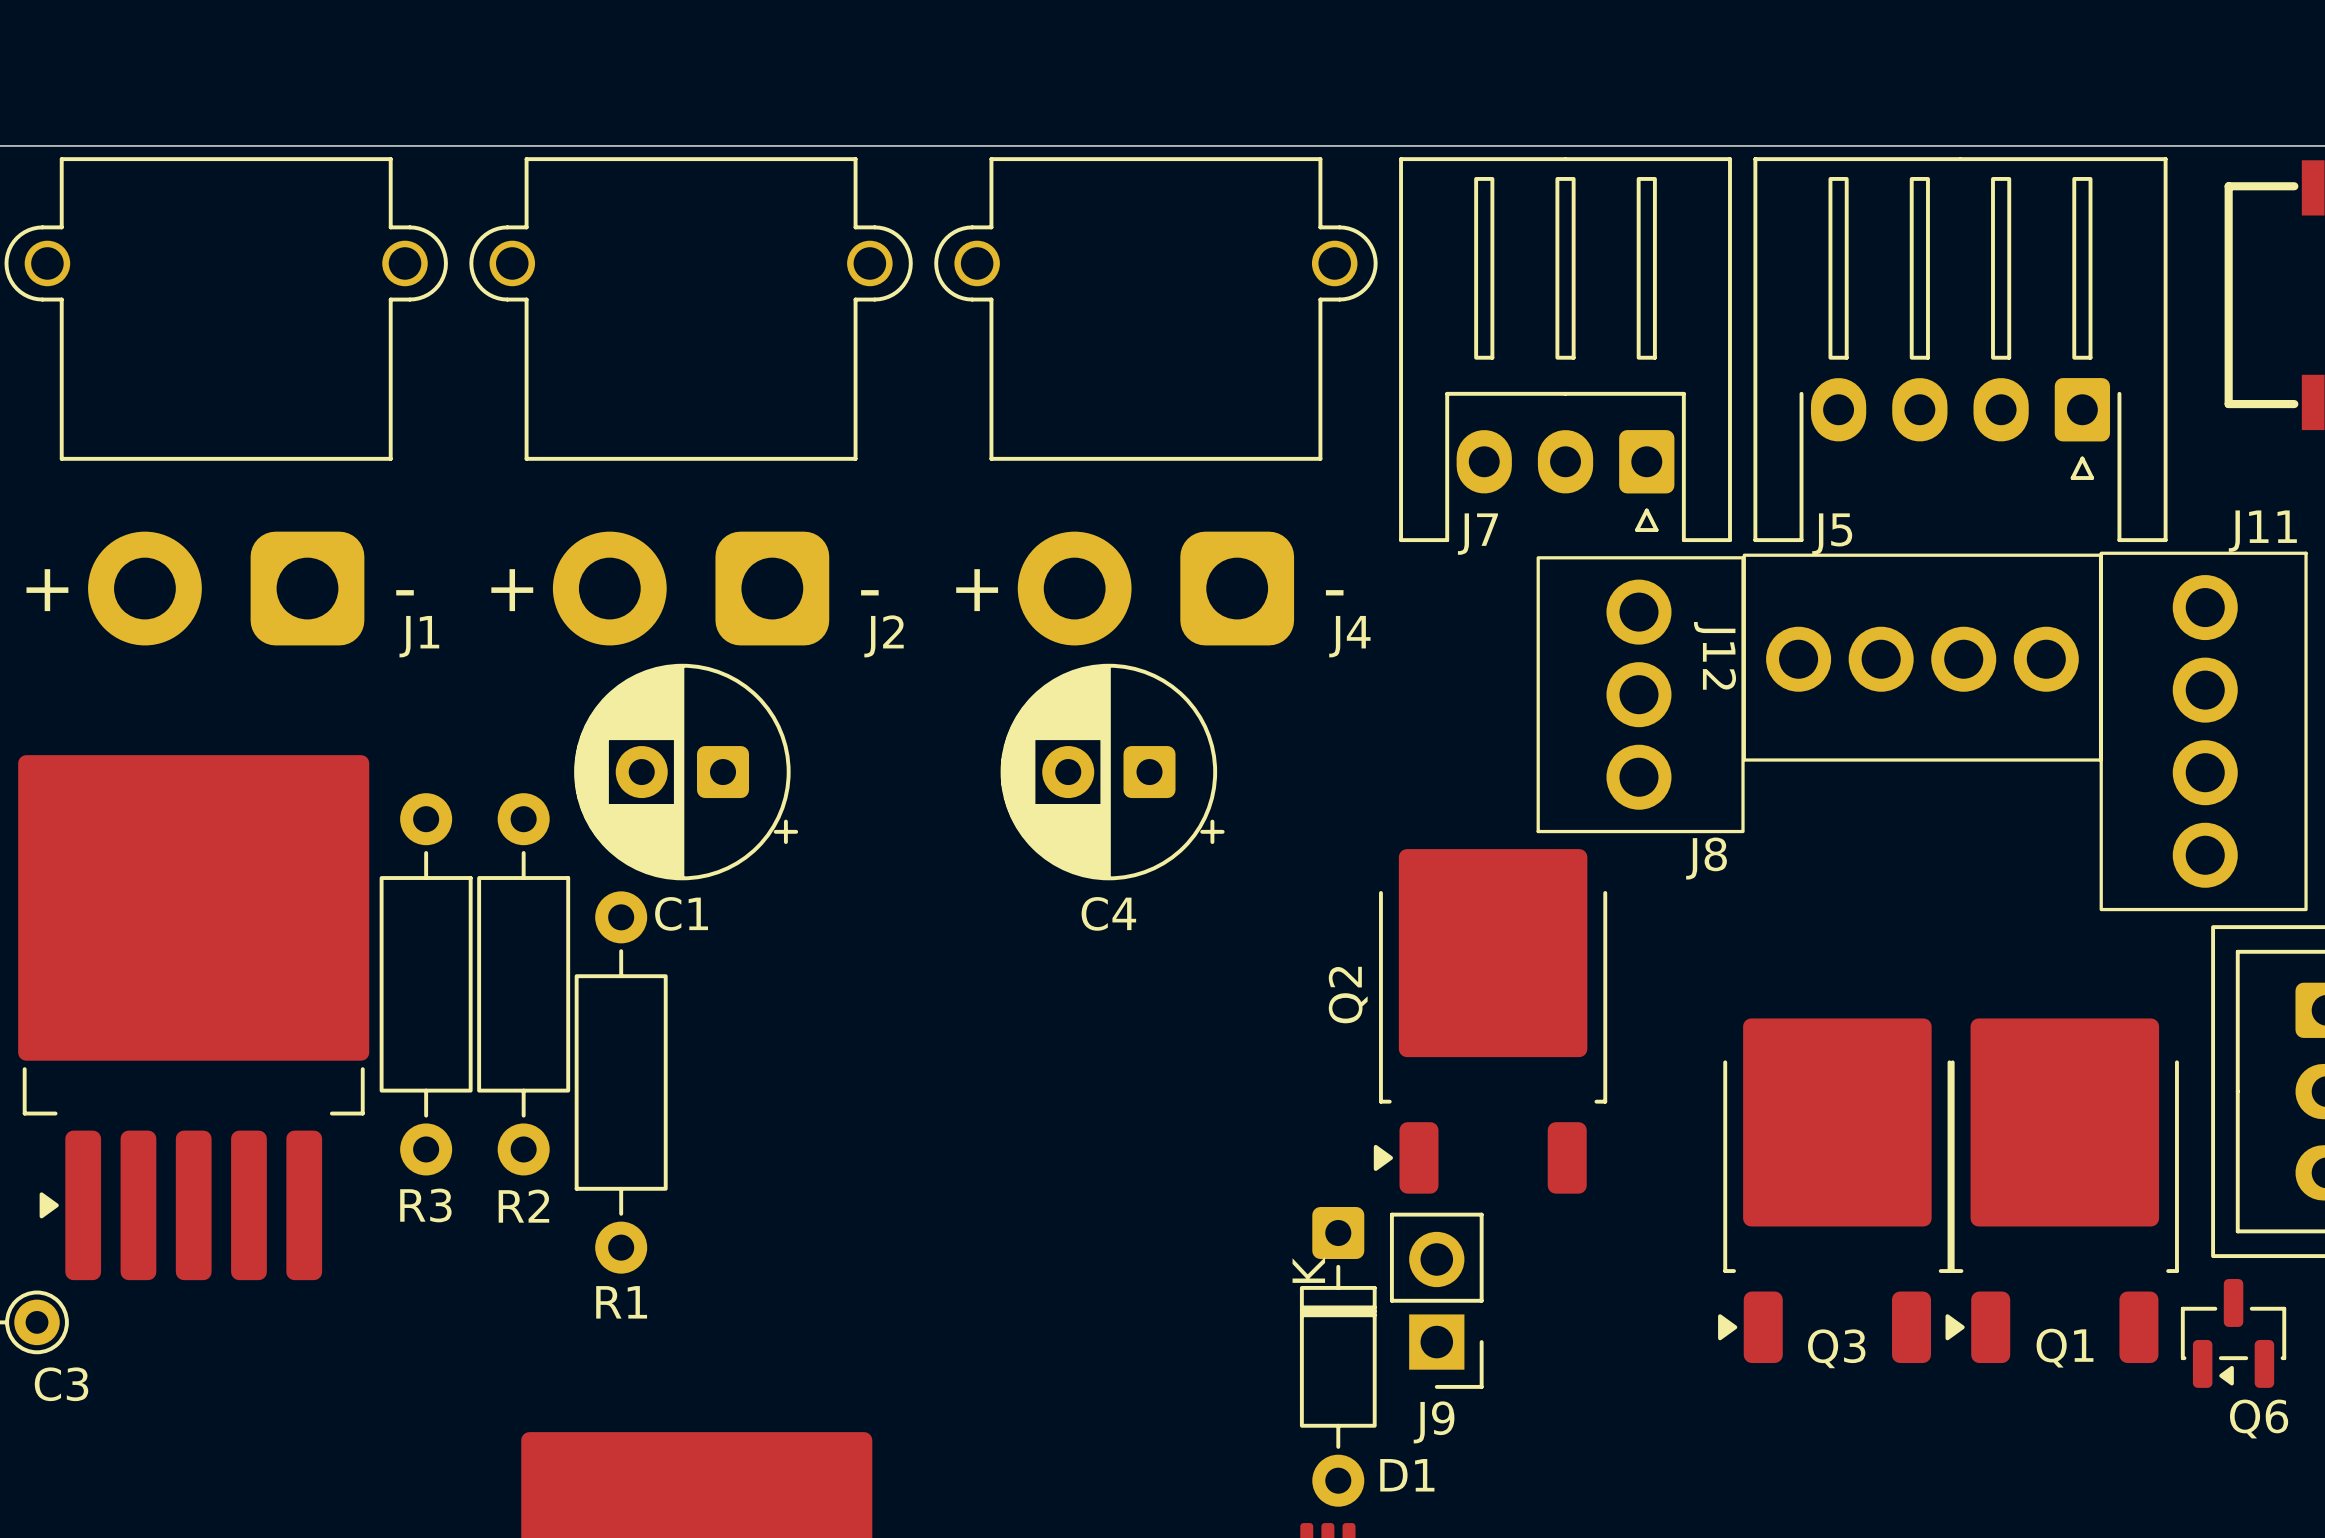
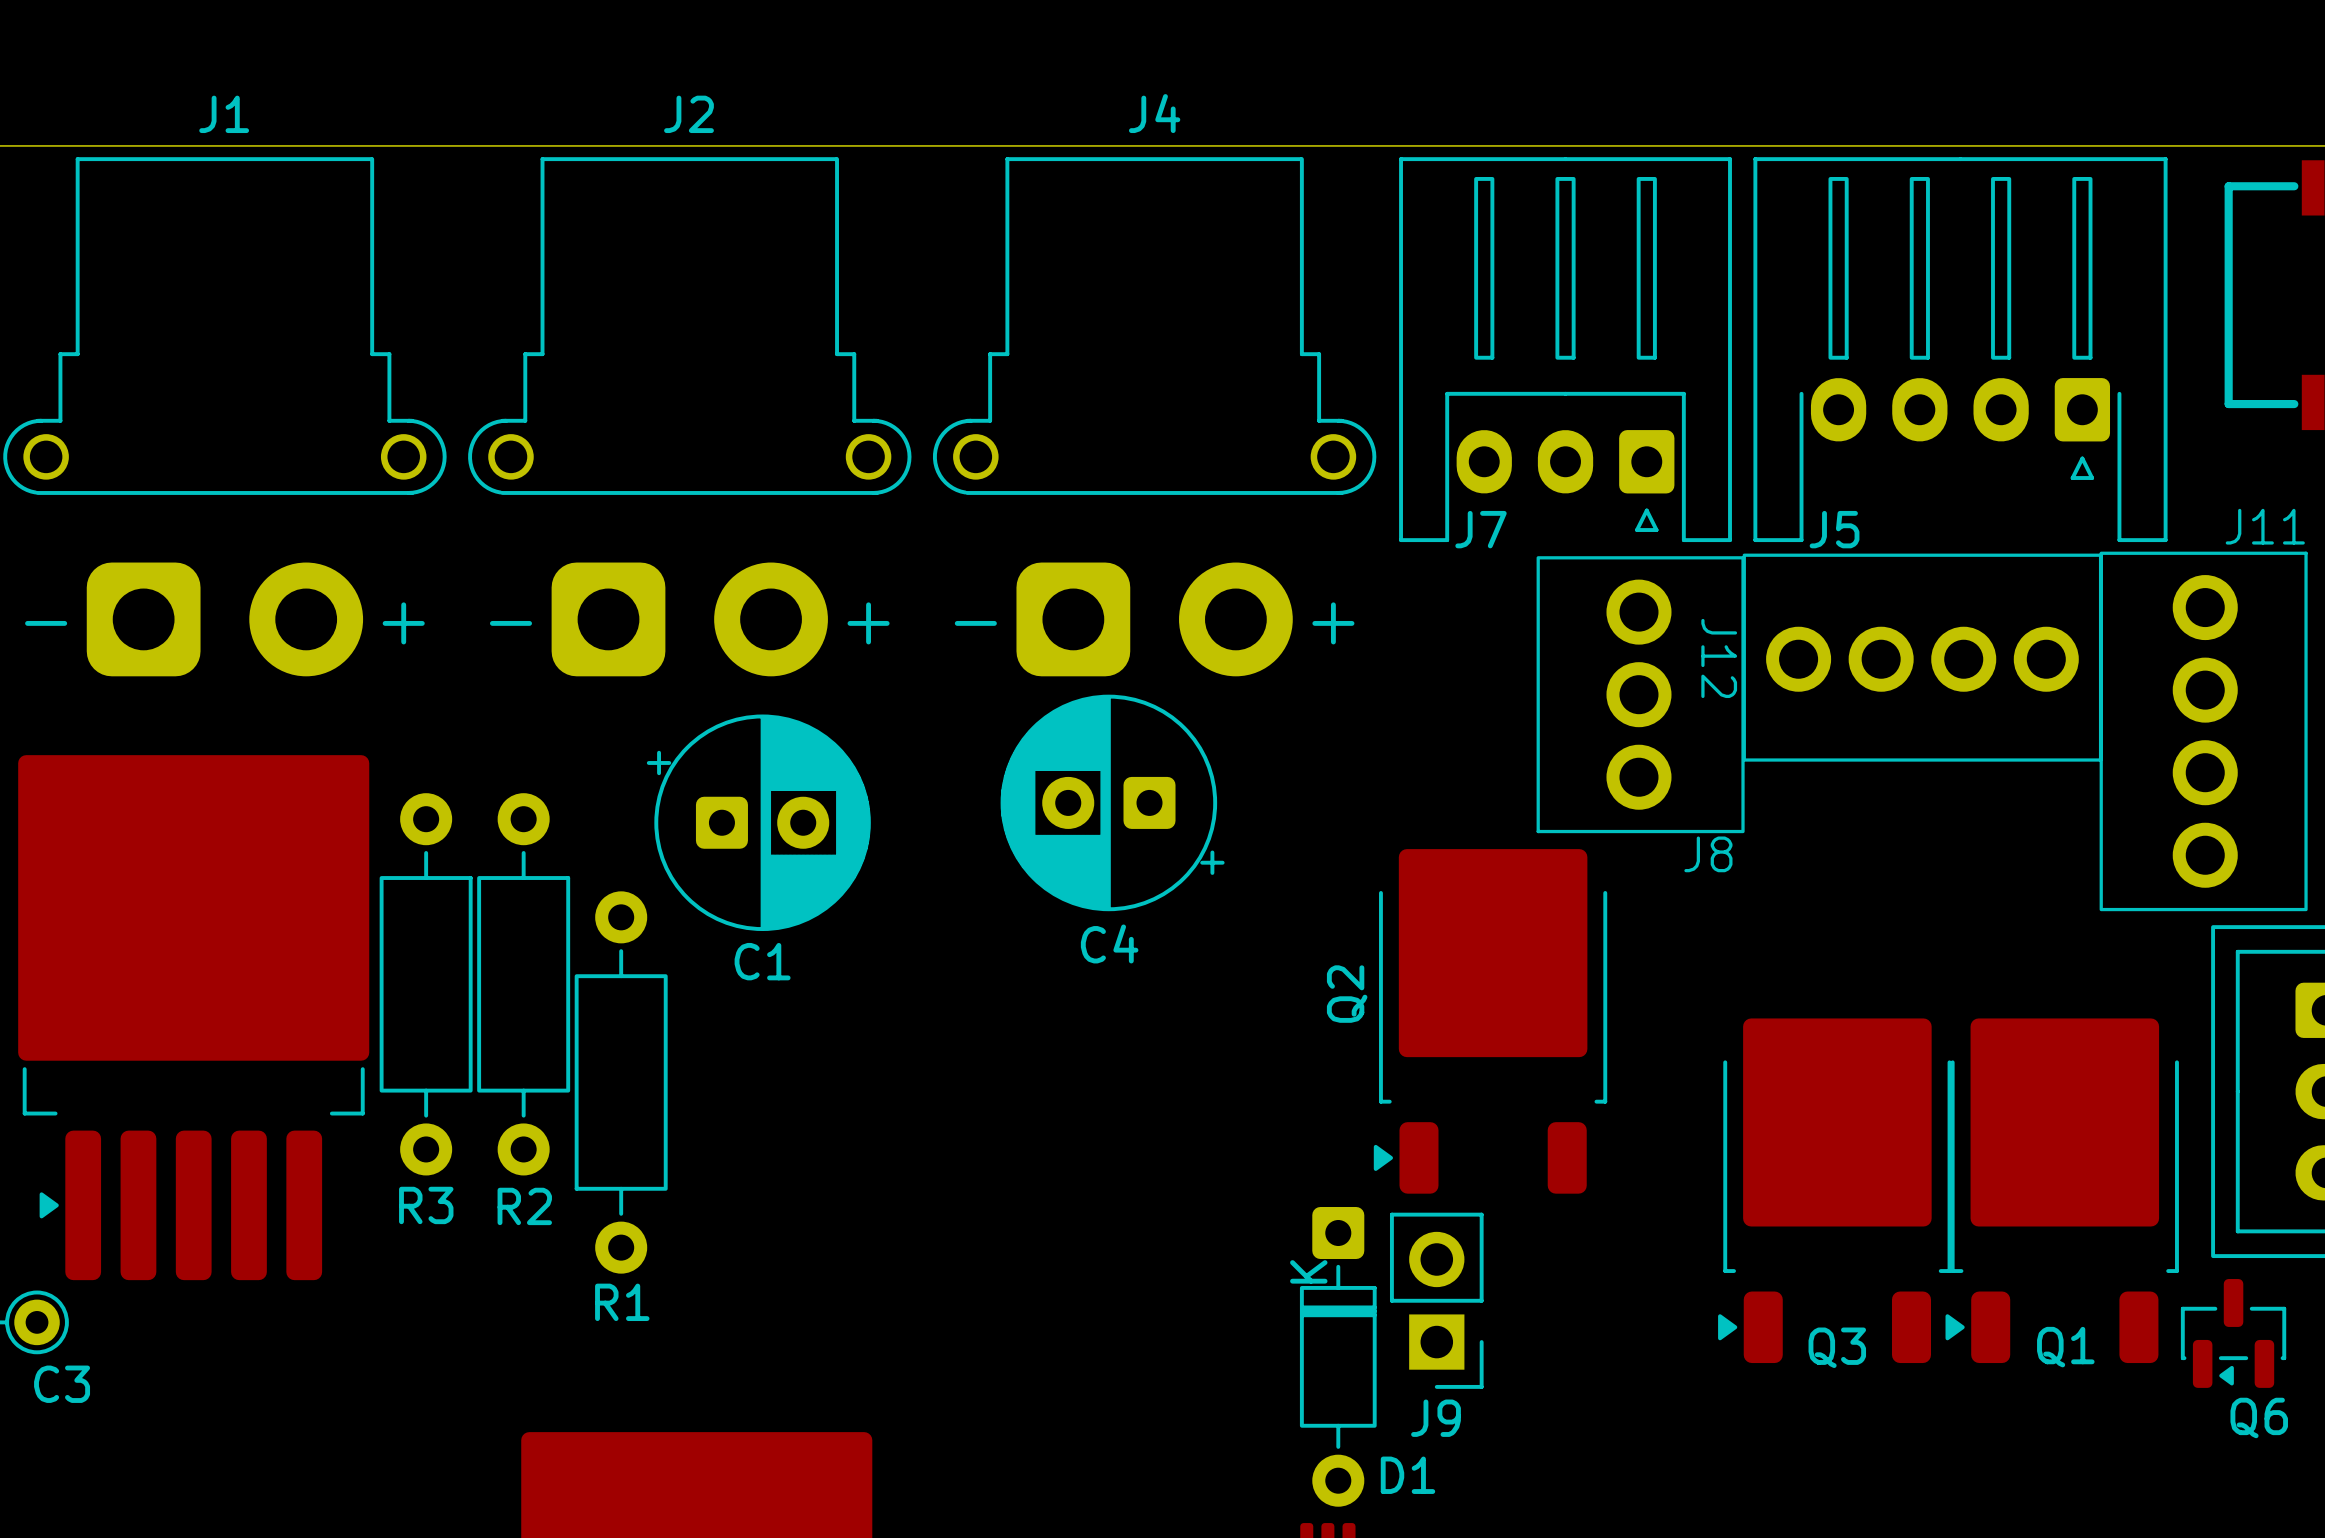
J1 footprint: [4, 157, 448, 646] -> [3, 157, 447, 677]
J2 footprint: [469, 157, 913, 646] -> [468, 157, 912, 677]
J4 footprint: [934, 157, 1378, 646] -> [932, 157, 1377, 677]
J1 name position: J1 (419, 636) -> J1 (224, 114)
J2 name position: J2 (884, 636) -> J2 (689, 114)
J4 name position: J4 (1349, 636) -> J4 (1154, 113)
C1 rotation: 0° (686, 772) -> 180° (758, 822)
C4 position: (1112, 772) -> (1112, 802)

